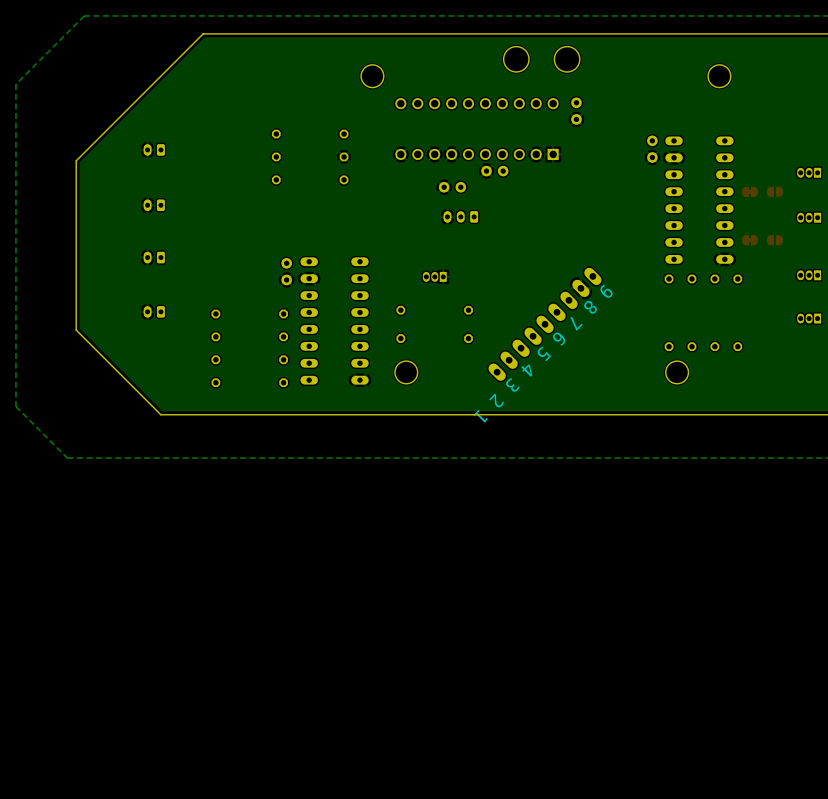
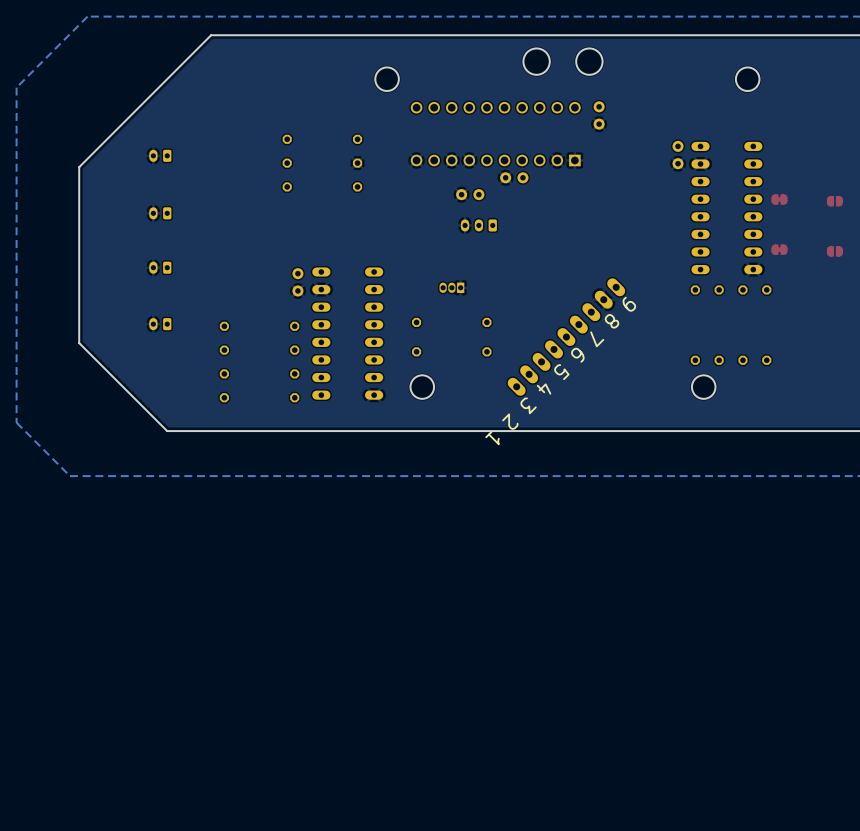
part: (809, 172) -> none
part: (775, 191) -> none
part: none -> (834, 201)
part: (809, 217) -> none
part: (775, 240) -> none
part: none -> (834, 251)
part: (809, 275) -> none
part: (809, 318) -> none

